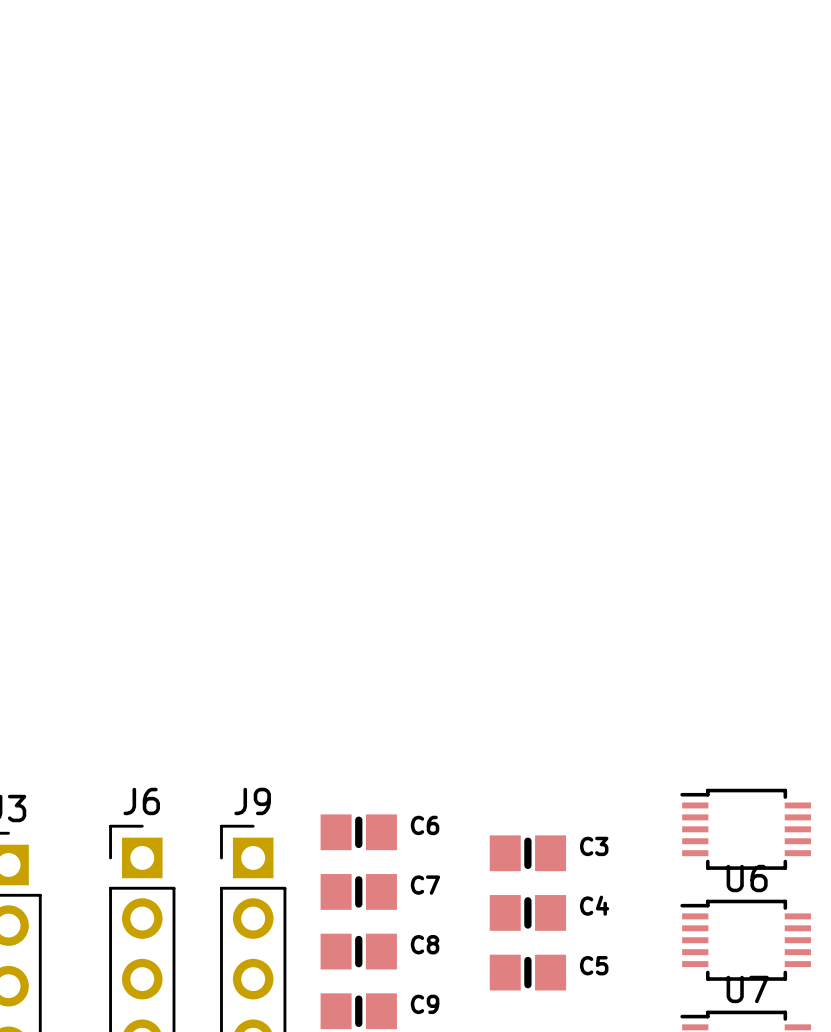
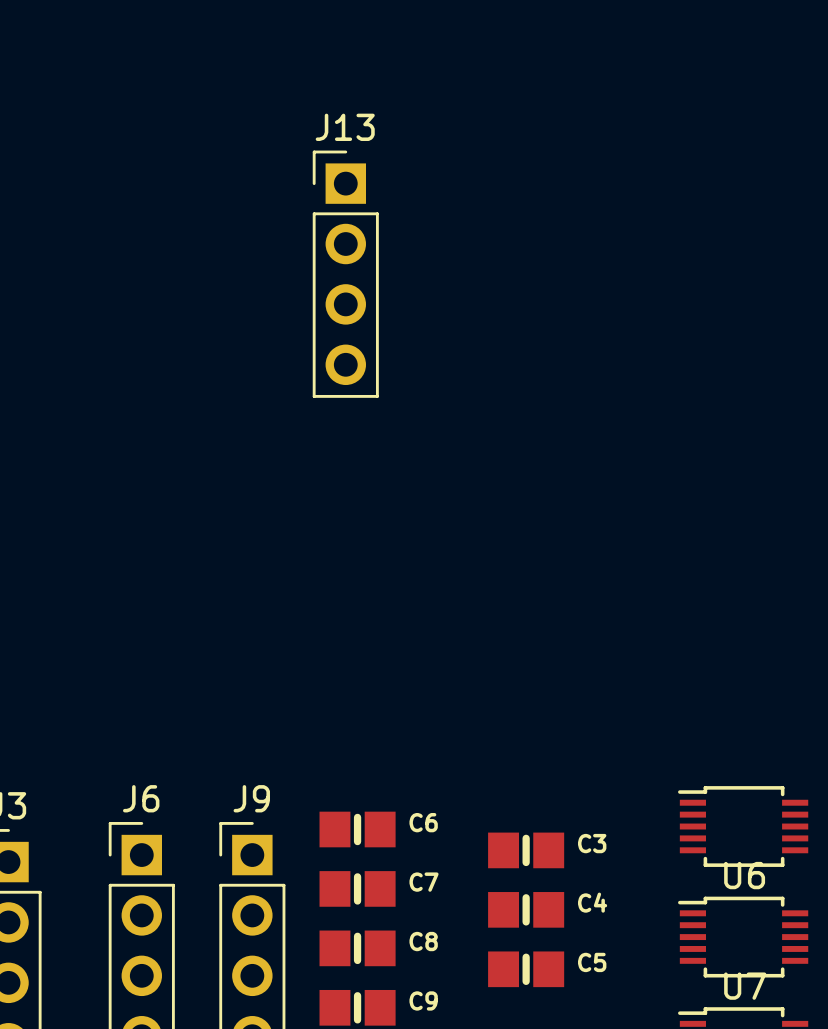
J13: none -> (345, 274)

